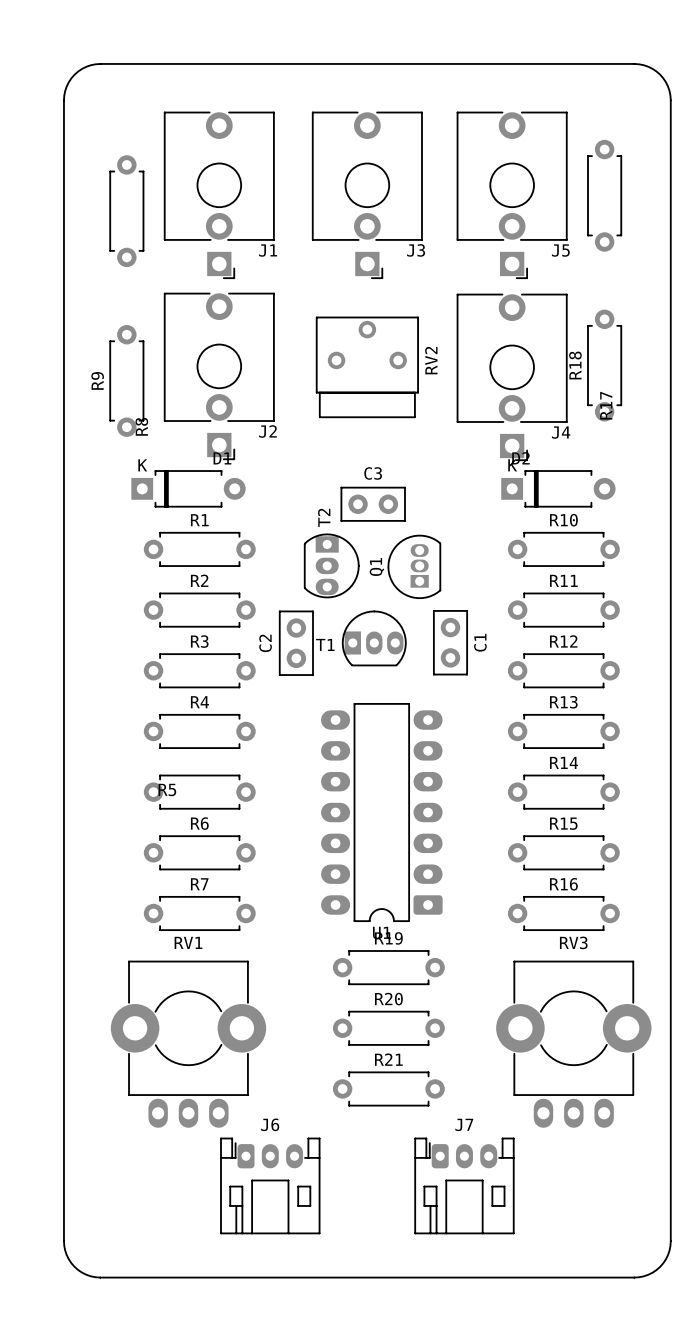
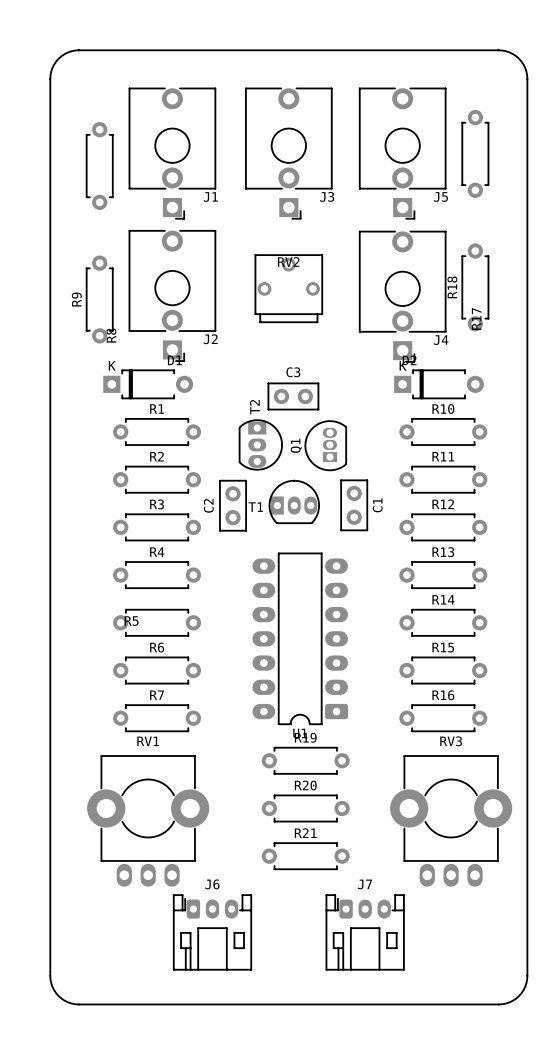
RV2 footprint: [315, 316, 419, 418] -> [254, 254, 323, 323]
RV2 name position: RV2 (431, 360) -> RV2 (288, 261)

